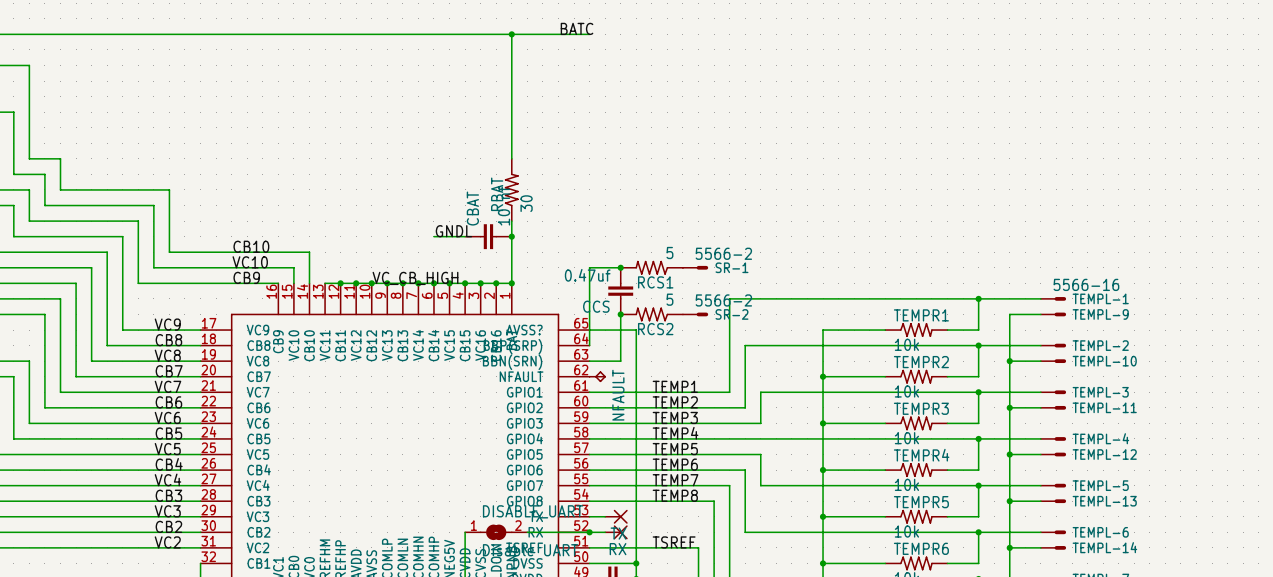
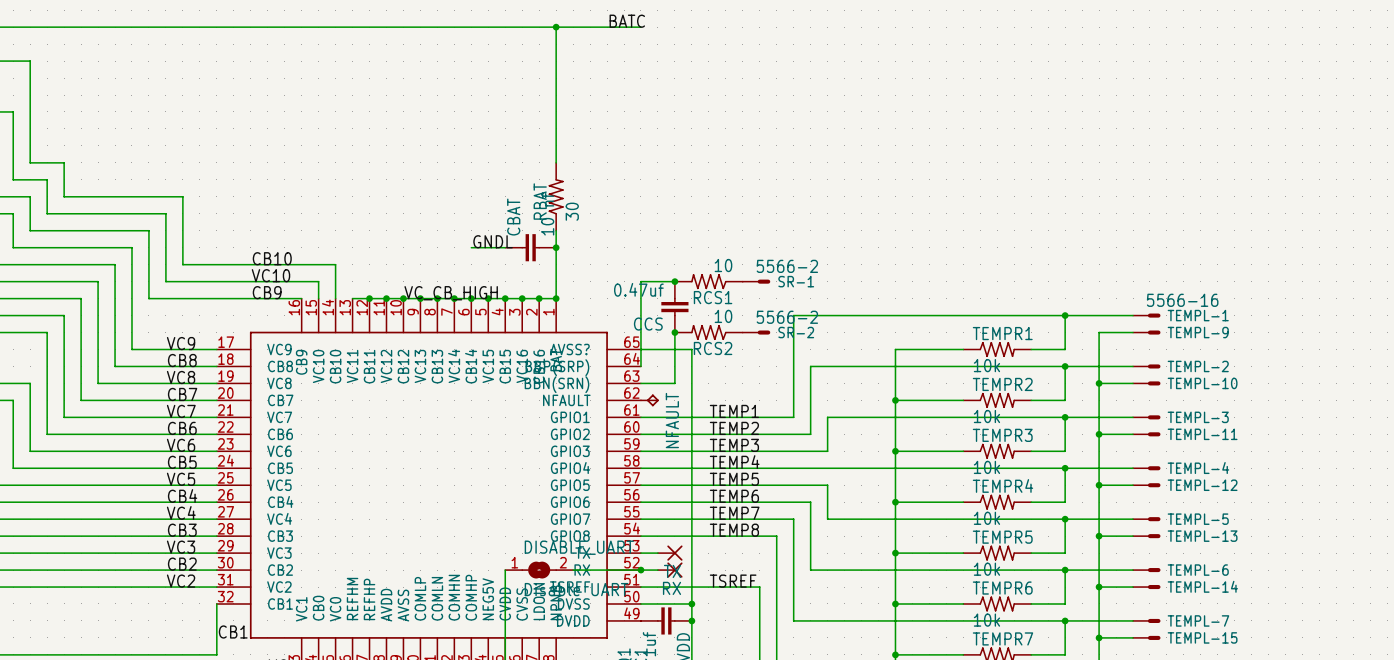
RCS1 value: 5 (669, 252) -> 10 (723, 265)
RCS2 value: 5 (669, 299) -> 10 (723, 316)

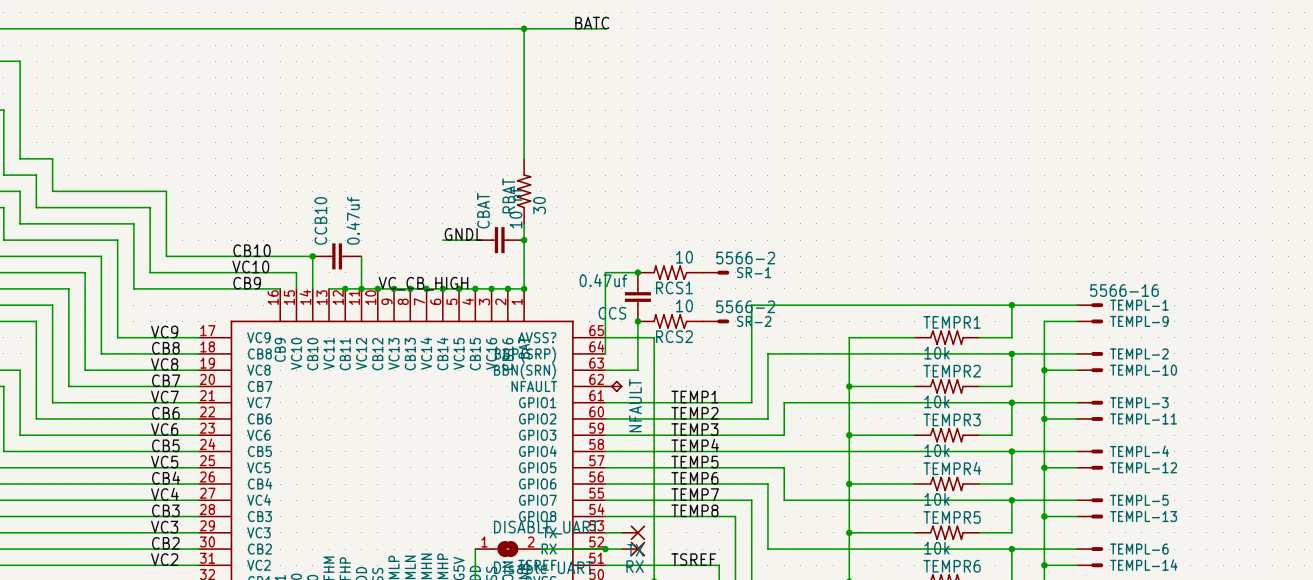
junction: none -> (312, 256)
CCB10: none -> 0.47uf (337, 256)
wire: none -> (361, 256) (361, 288)

